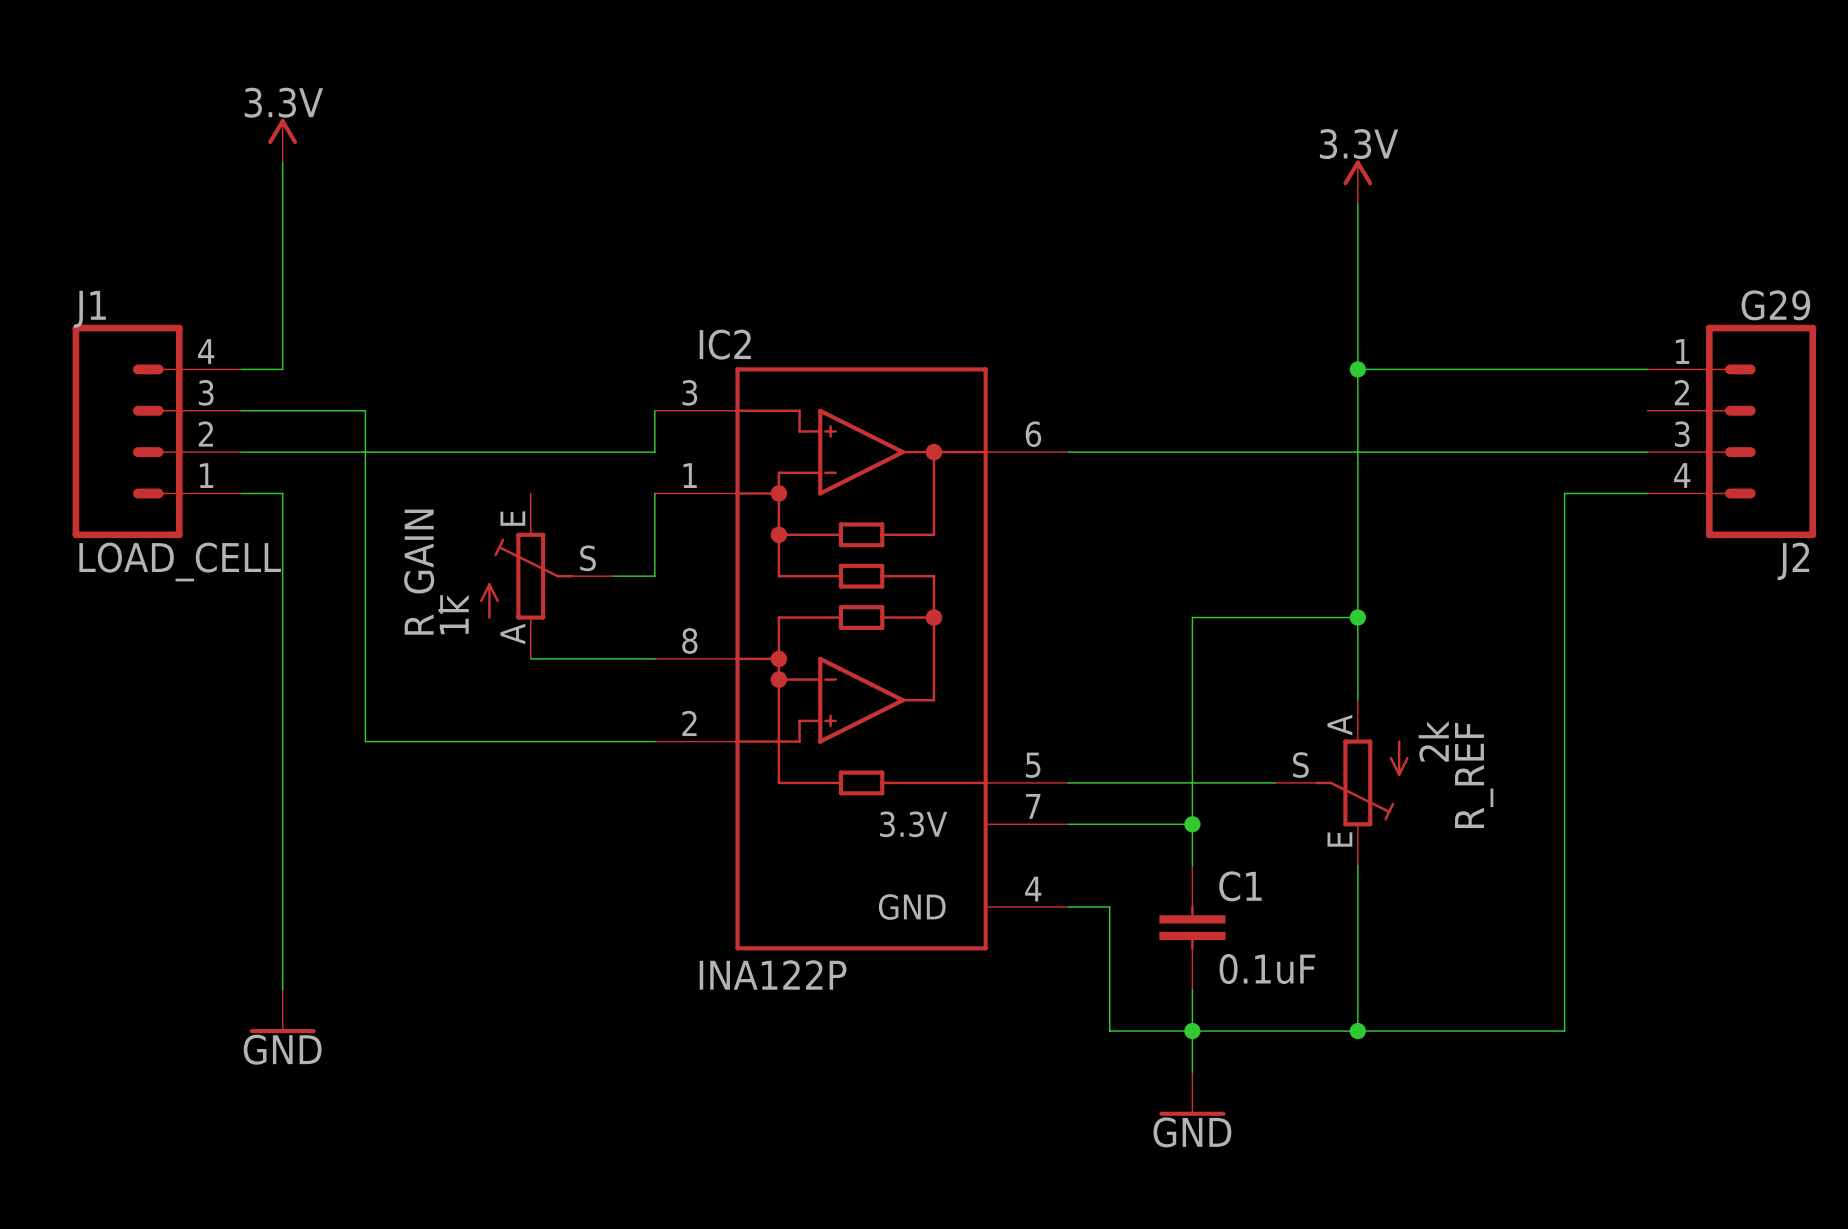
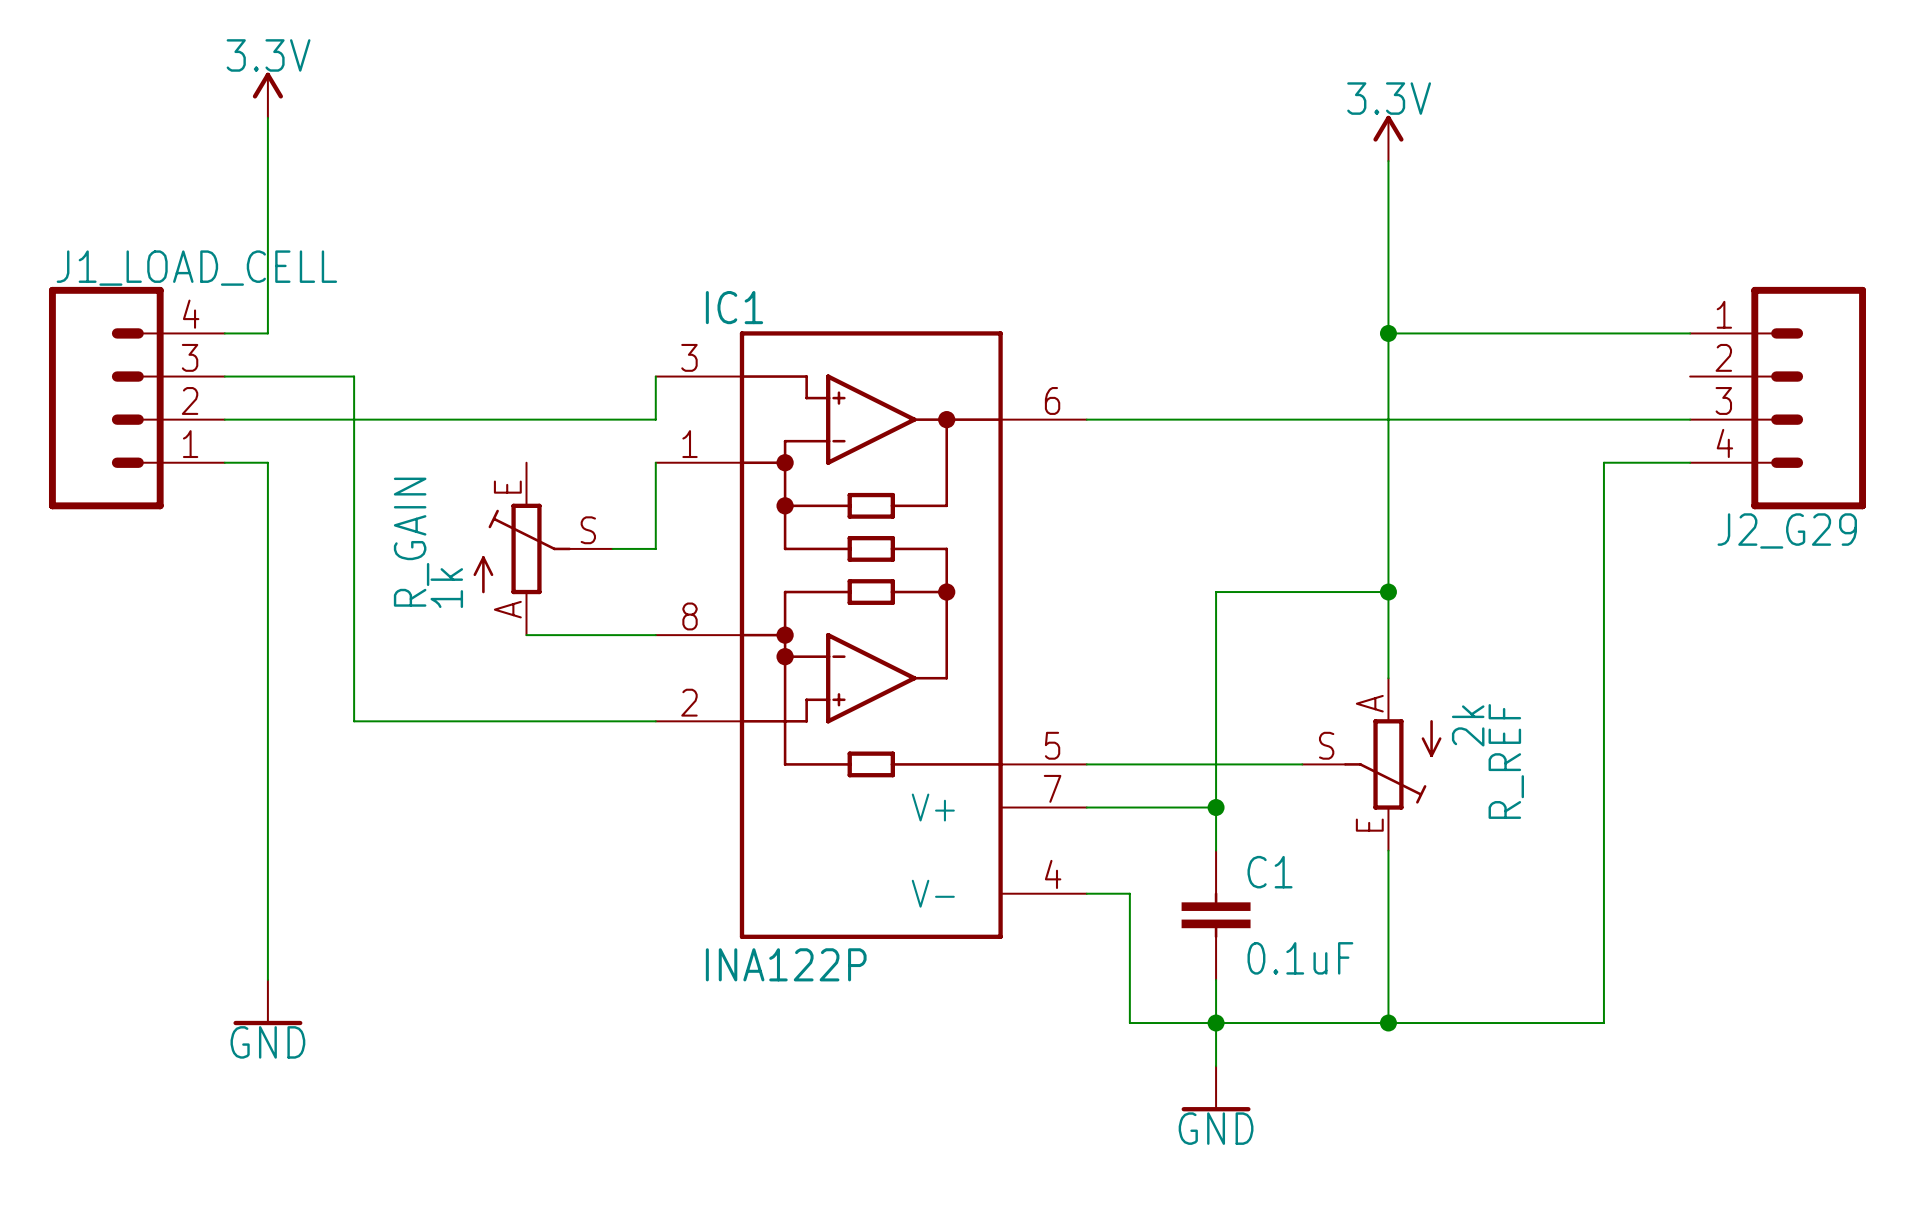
J2 value: G29 (1775, 305) -> none
J1 name: J1 (89, 309) -> J1_LOAD_CELL (196, 268)
IC2 name: IC2 (725, 344) -> IC1 (734, 307)
J1 value: LOAD_CELL (180, 561) -> none
J2 name: J2 (1793, 561) -> J2_G29 (1787, 530)
IC2 pin name: 3.3V (913, 824) -> V+ (933, 807)
IC2 pin name: GND (912, 907) -> V- (933, 893)

